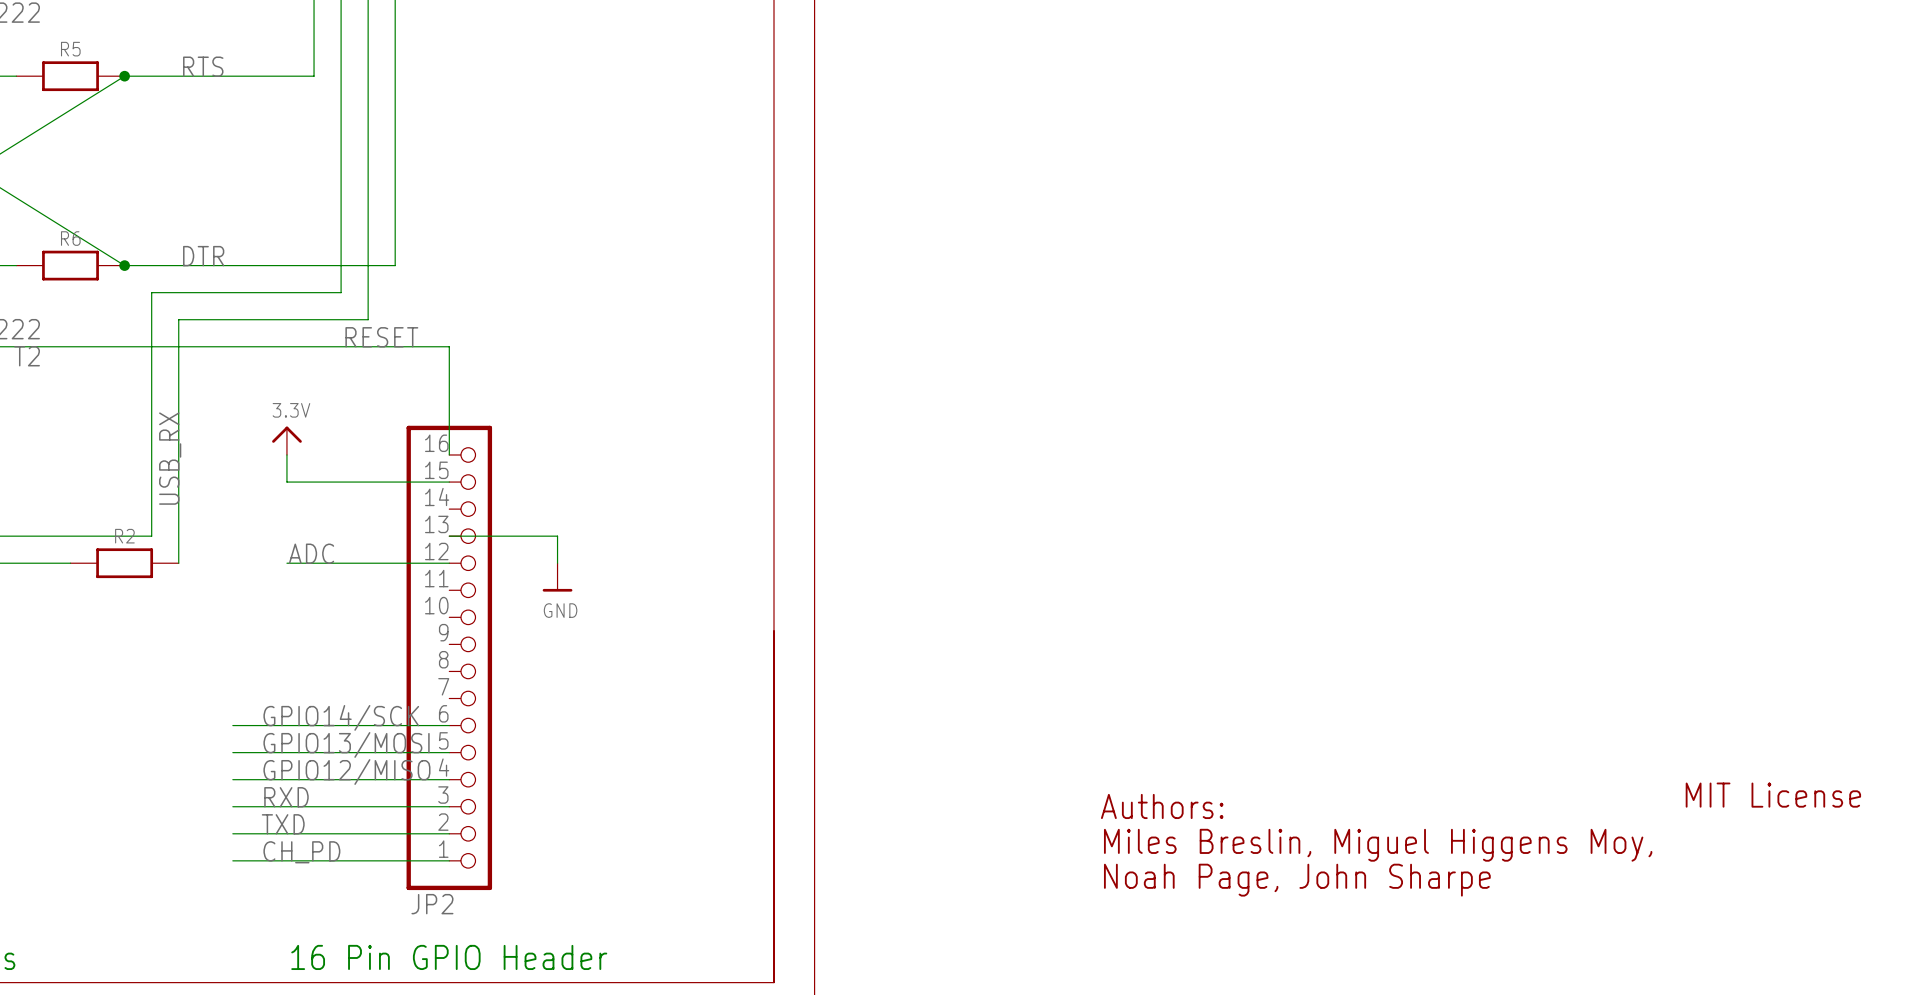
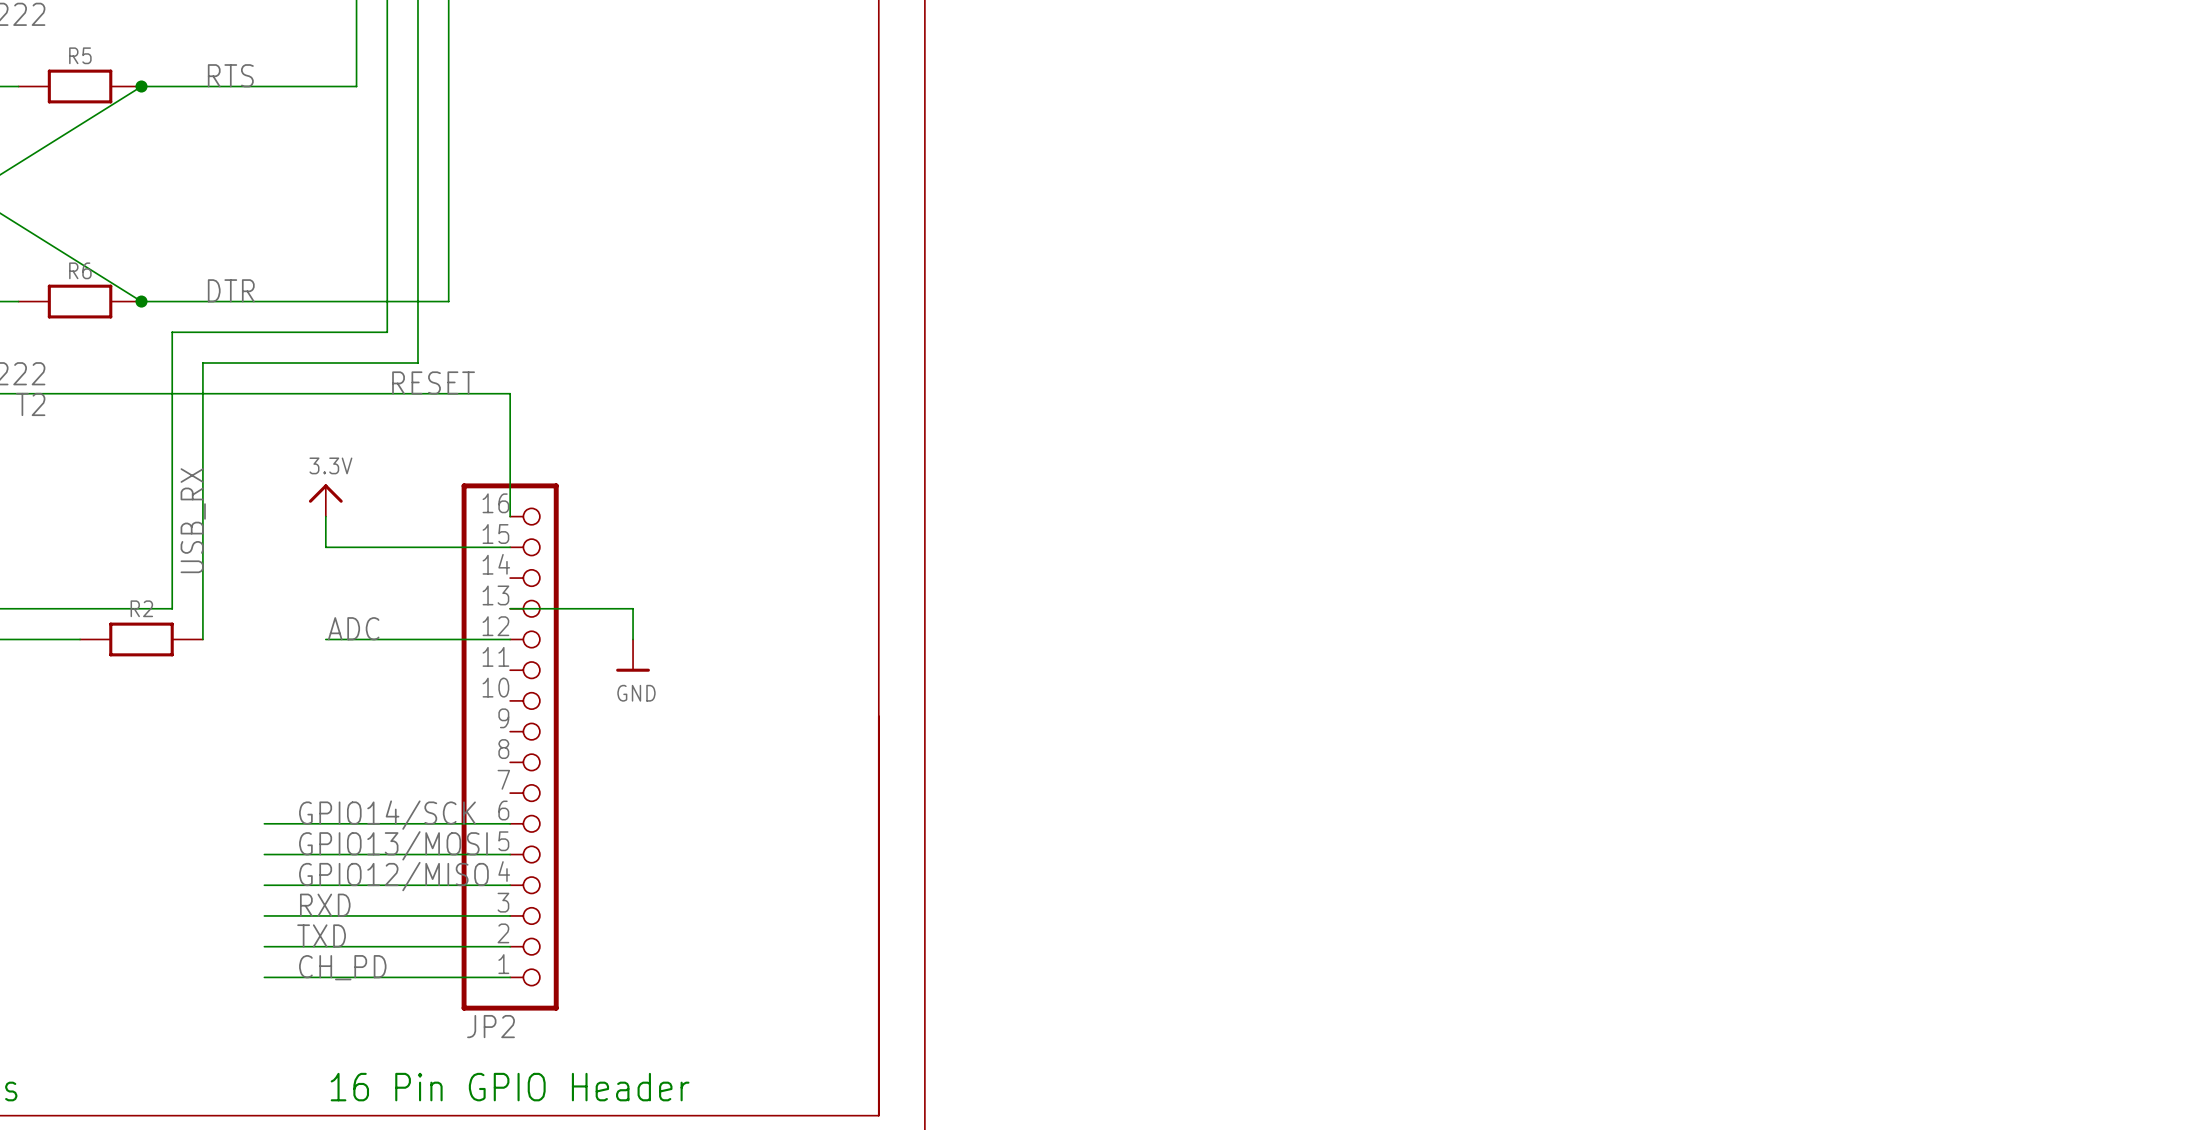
text: MIT License (1773, 795) -> none
text: Authors: (1162, 806) -> none
text: Miles Breslin, Miguel Higgens Moy, (1378, 845) -> none
text: Noah Page, John Sharpe (1297, 880) -> none

